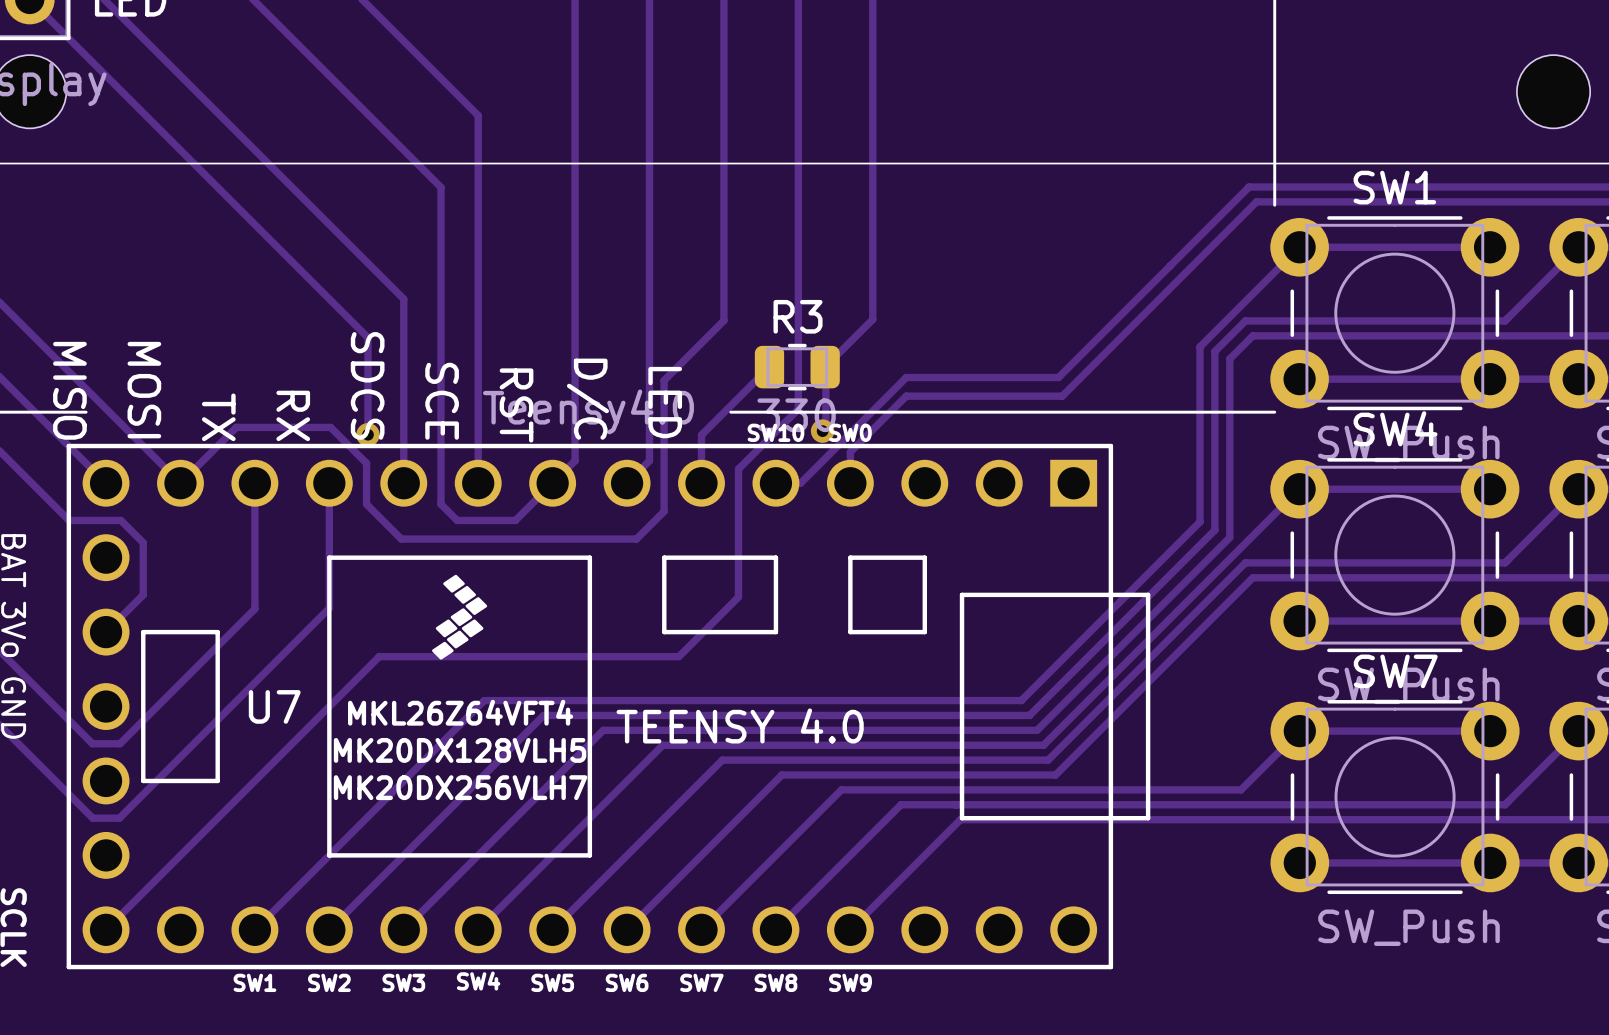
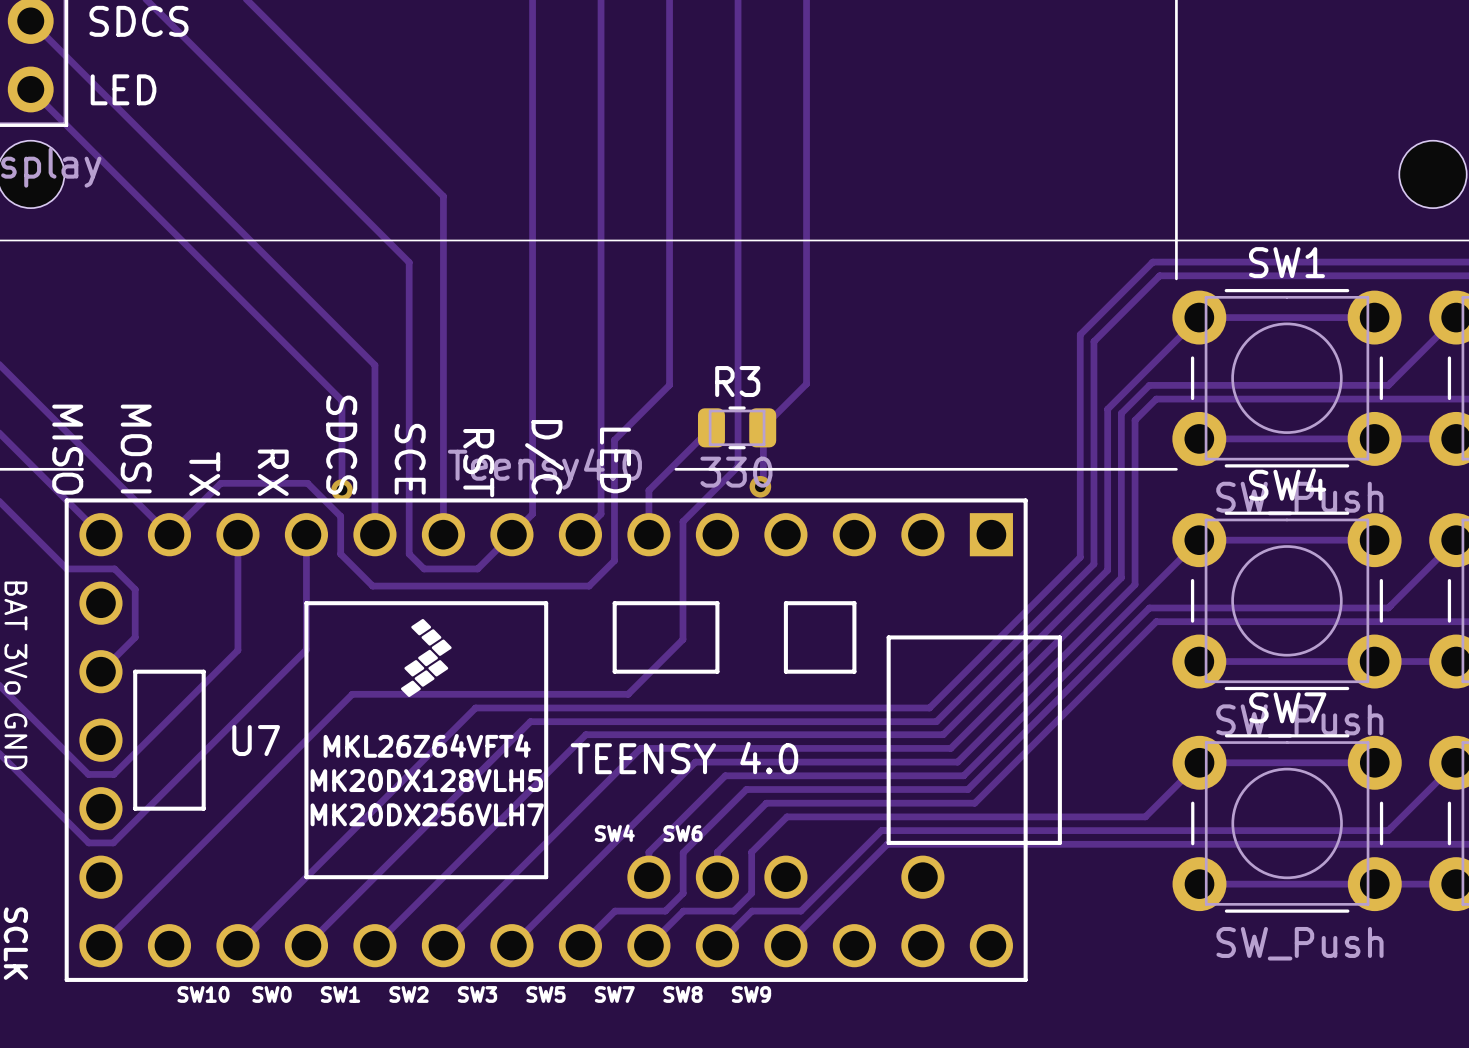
track: (1170, 265) (1058, 377) (906, 377) (800, 483) (775, 483) -> (1080, 334) (1080, 557) (929, 707) (475, 707) (448, 734)
track: (1185, 273) (1062, 396) (906, 396) (850, 452) (850, 483) -> (1093, 341) (1093, 564) (936, 721) (530, 721) (503, 748)
text: SW10 (775, 432) -> none
text: SW0 (850, 432) -> none
U7 footprint: [66, 443, 1151, 970] -> [64, 498, 1062, 982]
track: (633, 700) (484, 700) -> none
track: (692, 715) (543, 715) -> none
track: (752, 730) (603, 730) -> (585, 734) (558, 762)
track: (784, 745) (662, 745) -> (640, 748) (613, 775)
track: none -> (725, 775) (648, 852) (648, 877)
track: (807, 760) (722, 760) -> (695, 762) (668, 789)
track: (829, 775) (781, 775) (664, 892) -> (746, 789) (683, 852) (683, 893) (665, 911) (615, 911)
track: none -> (766, 803) (717, 852) (717, 877)
track: (851, 789) (841, 789) (739, 892) -> (786, 816) (751, 852) (751, 893) (733, 911) (683, 911)
track: (954, 804) (900, 804) (813, 892) -> (881, 830) (800, 911) (752, 911)
text position: SW4 (478, 981) -> SW4 (614, 833)
text: none -> SW10 (203, 994)
text position: SW1 (254, 982) -> SW1 (340, 994)
text: none -> SW0 (272, 994)
text position: SW2 (329, 982) -> SW2 (409, 994)
text position: SW3 (403, 982) -> SW3 (477, 994)
text position: SW5 (552, 982) -> SW5 (545, 994)
text position: SW6 (627, 982) -> SW6 (682, 833)
text position: SW7 (701, 982) -> SW7 (614, 994)
text position: SW8 (775, 982) -> SW8 (682, 994)
text position: SW9 (850, 982) -> SW9 (751, 994)

